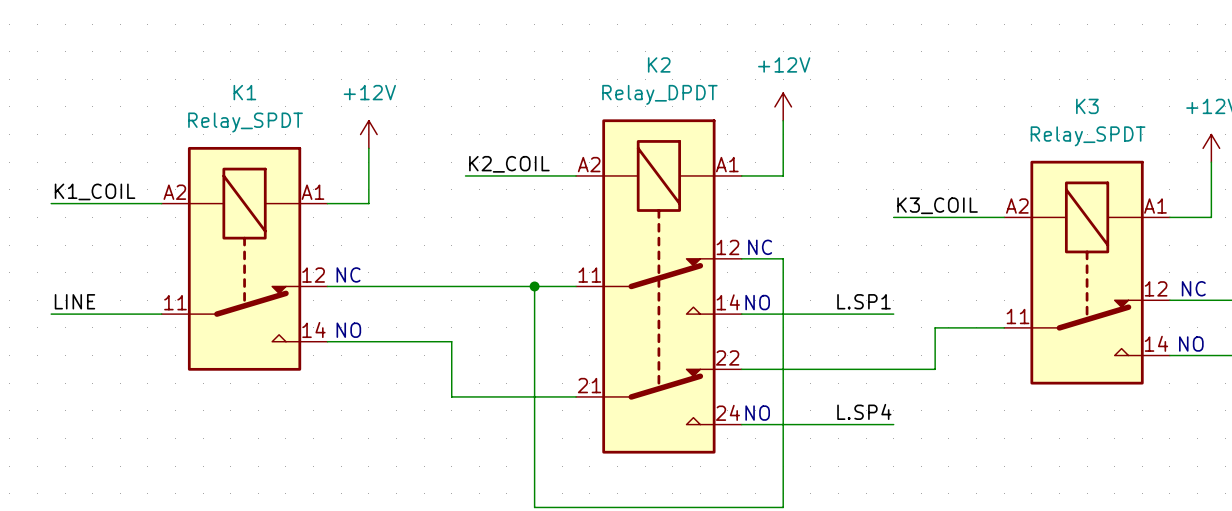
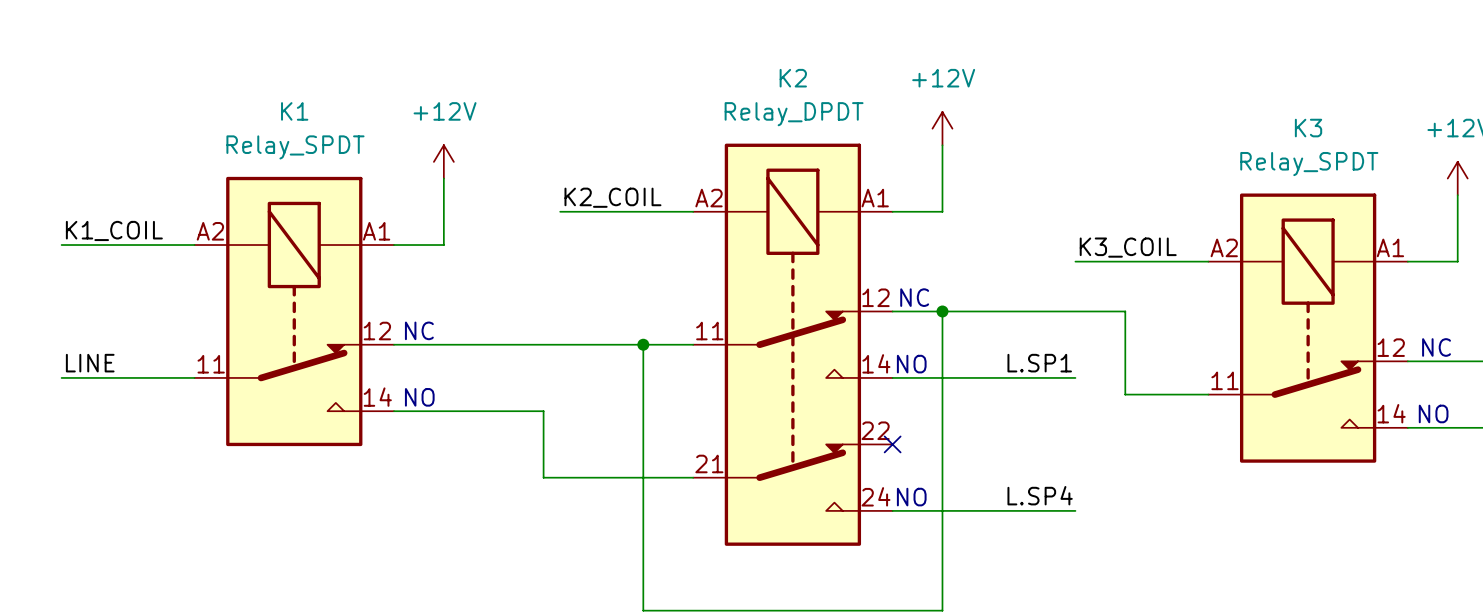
junction: none -> (942, 311)
wire: (935, 327) (935, 369) (741, 369) -> (1125, 394) (1125, 311) (942, 311)
no-connect mark: none -> (892, 444)

